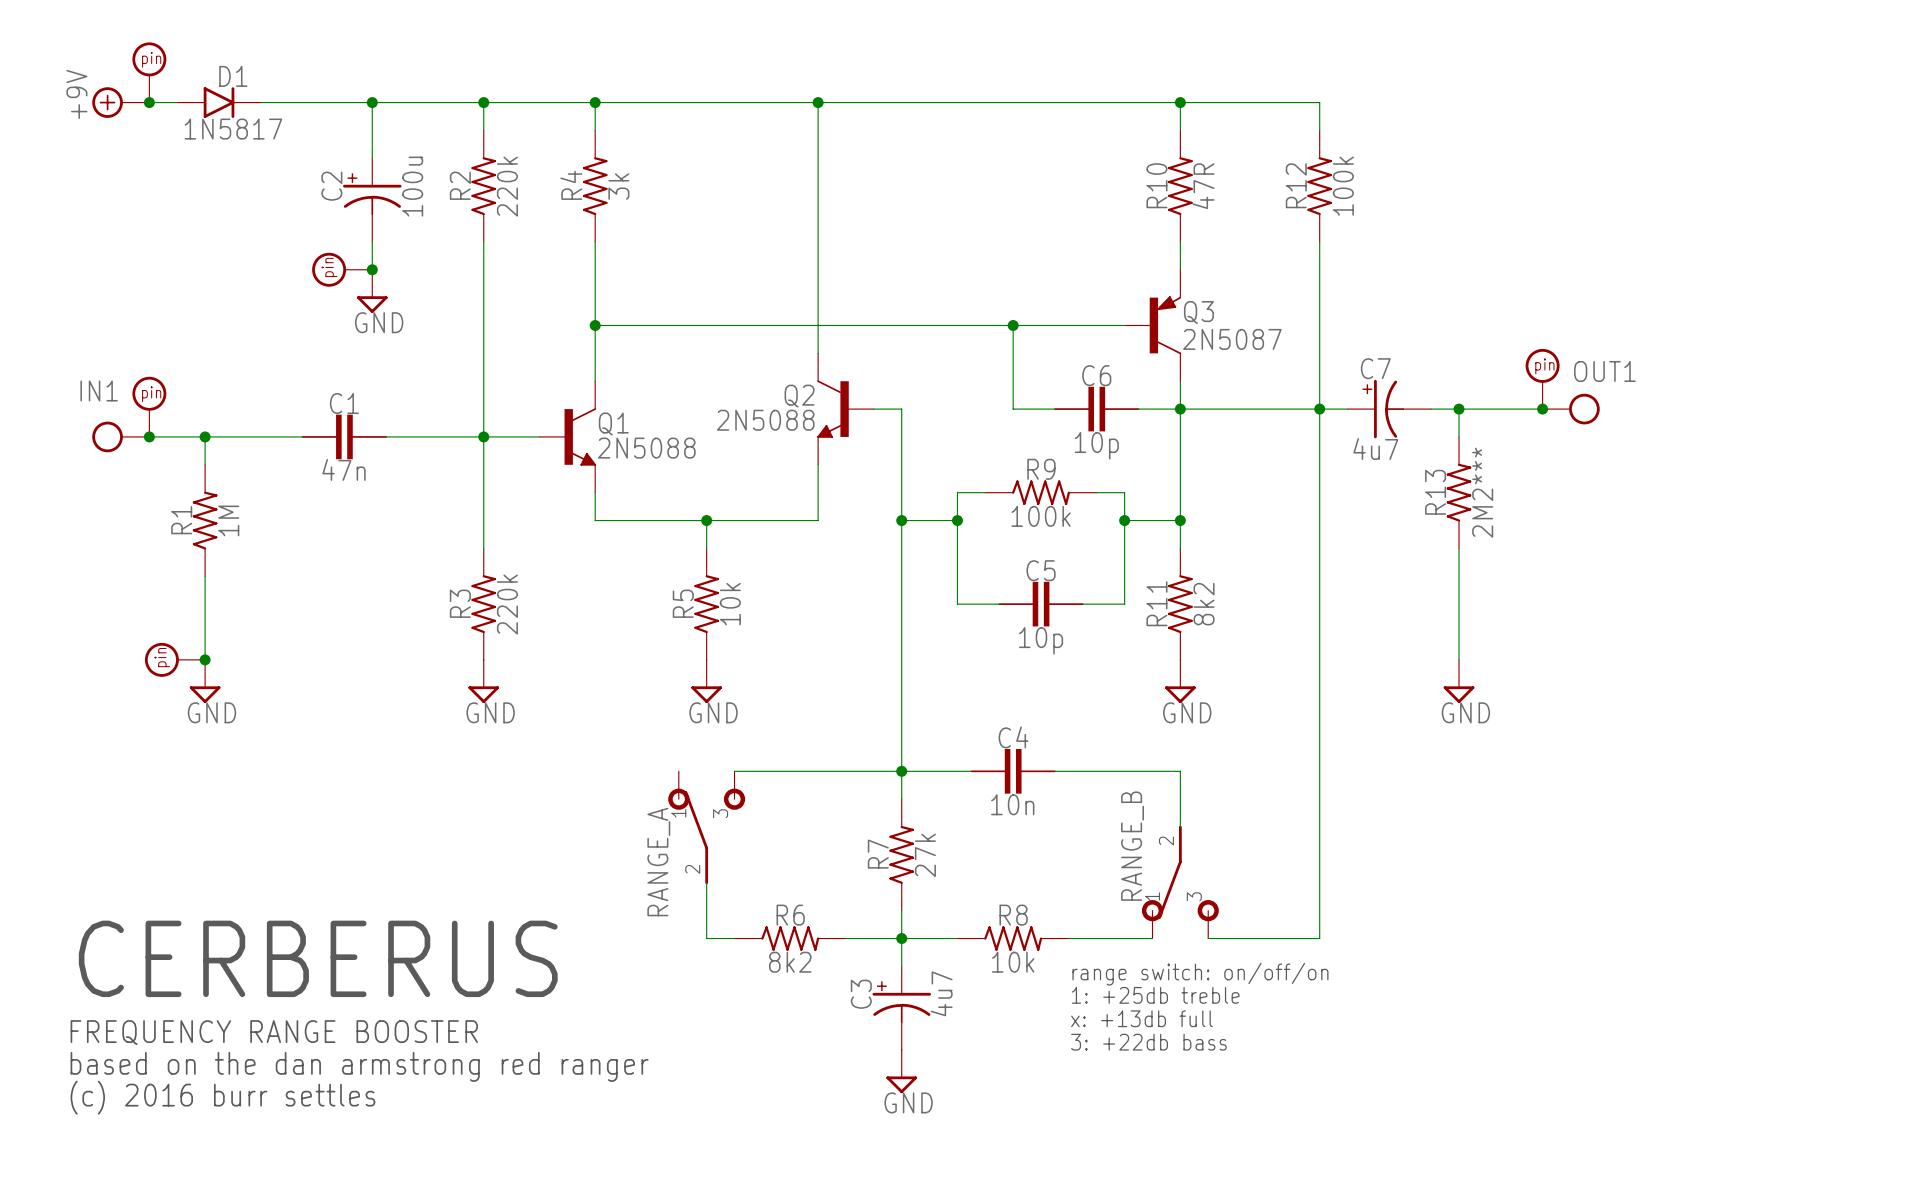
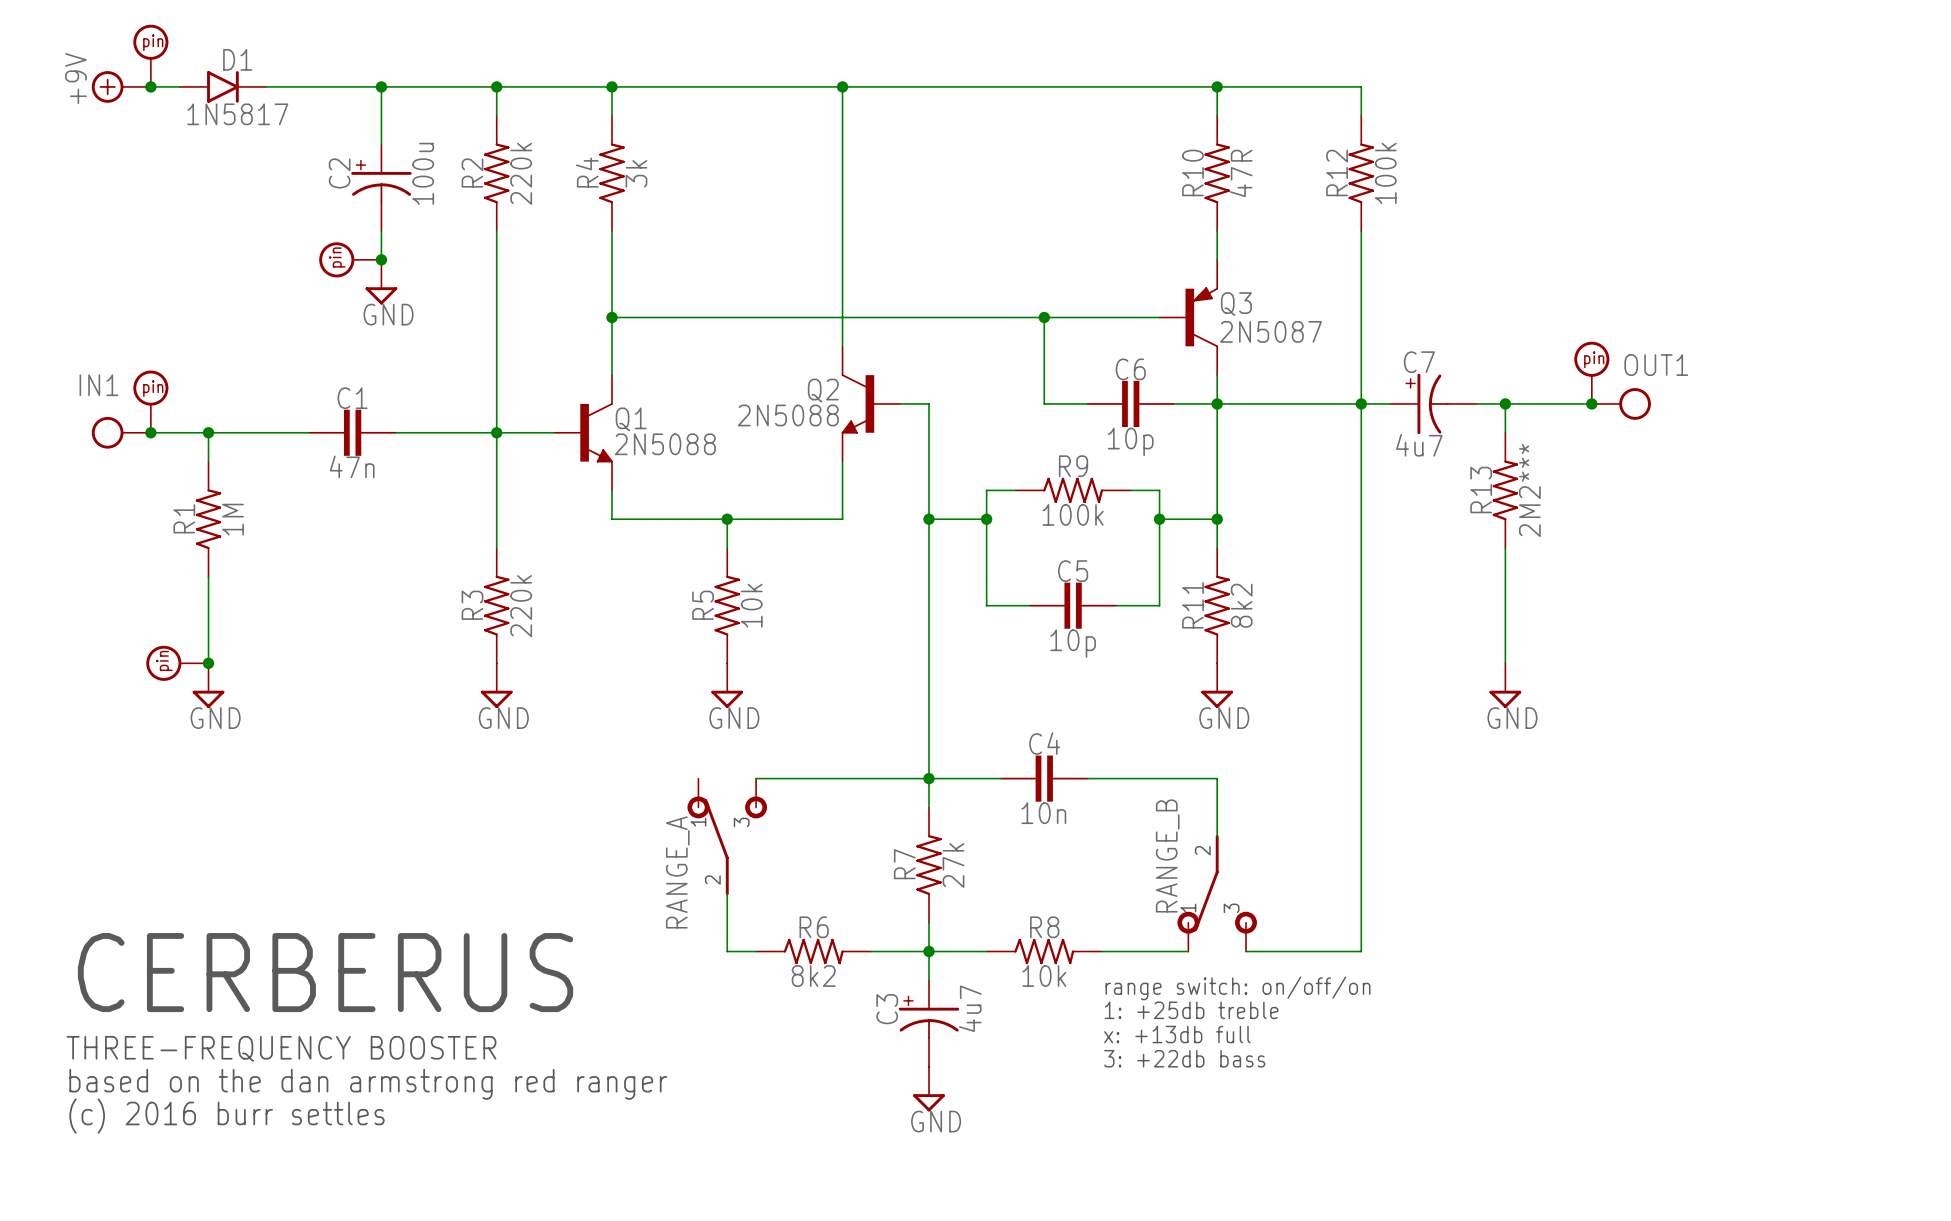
text: FREQUENCY RANGE BOOSTER (274, 1032) -> THREE-FREQUENCY BOOSTER (281, 1048)

